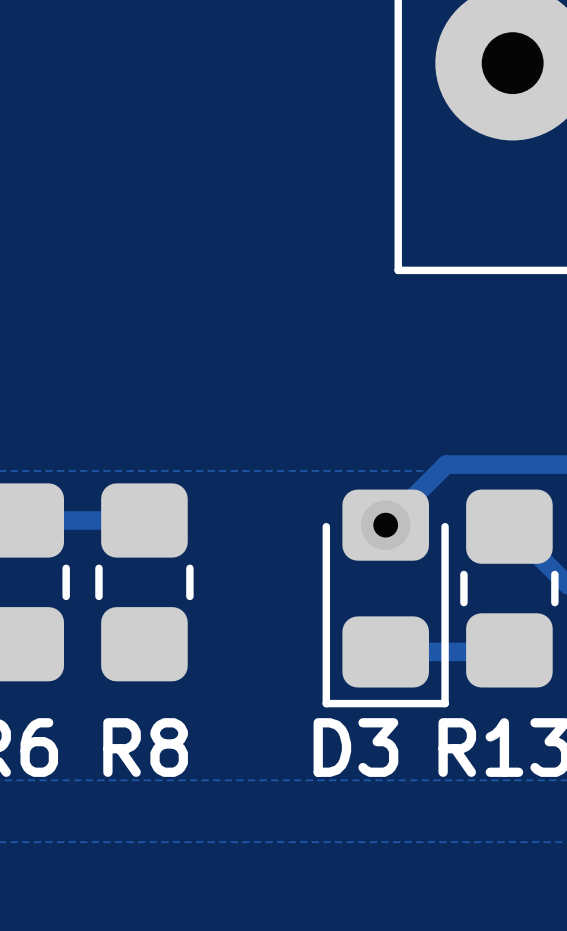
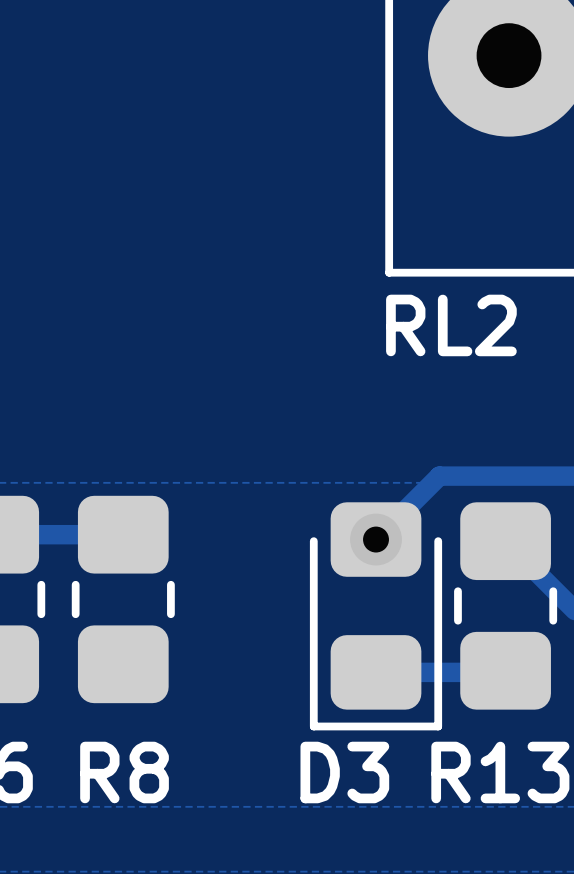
text: none -> RL2 (451, 325)

